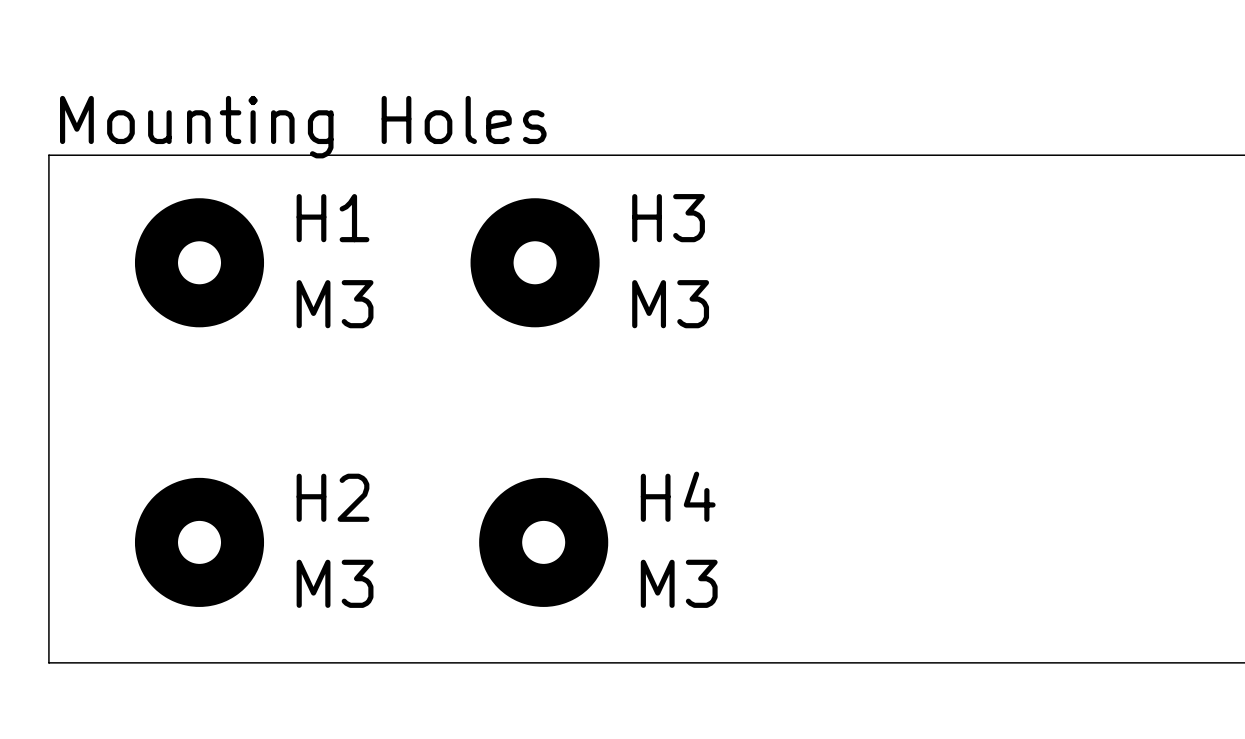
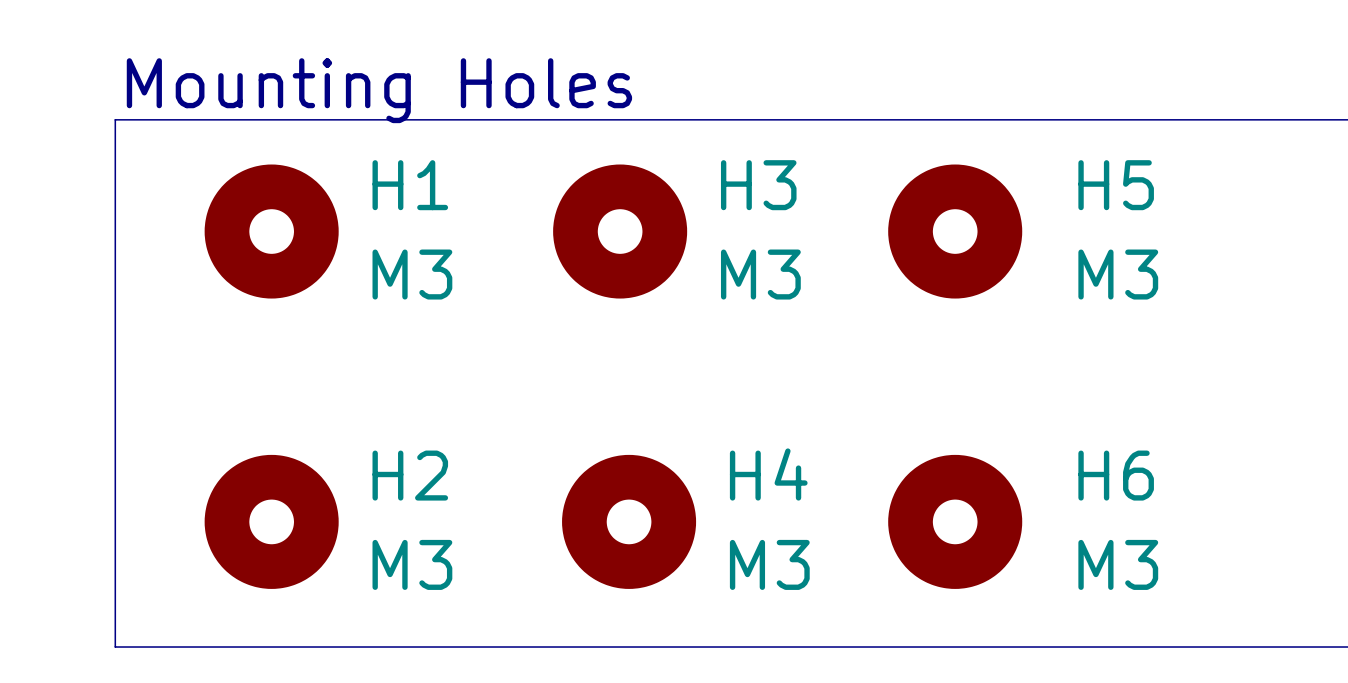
H5: none -> M3 (955, 231)
H6: none -> M3 (955, 521)

